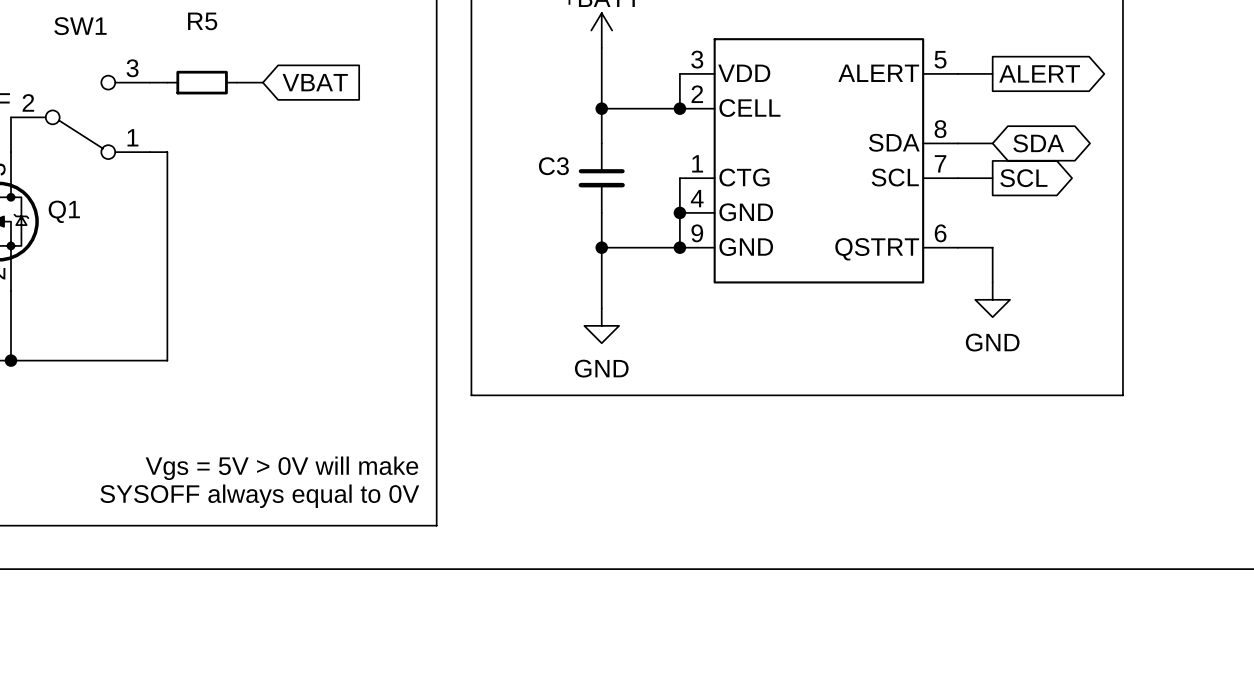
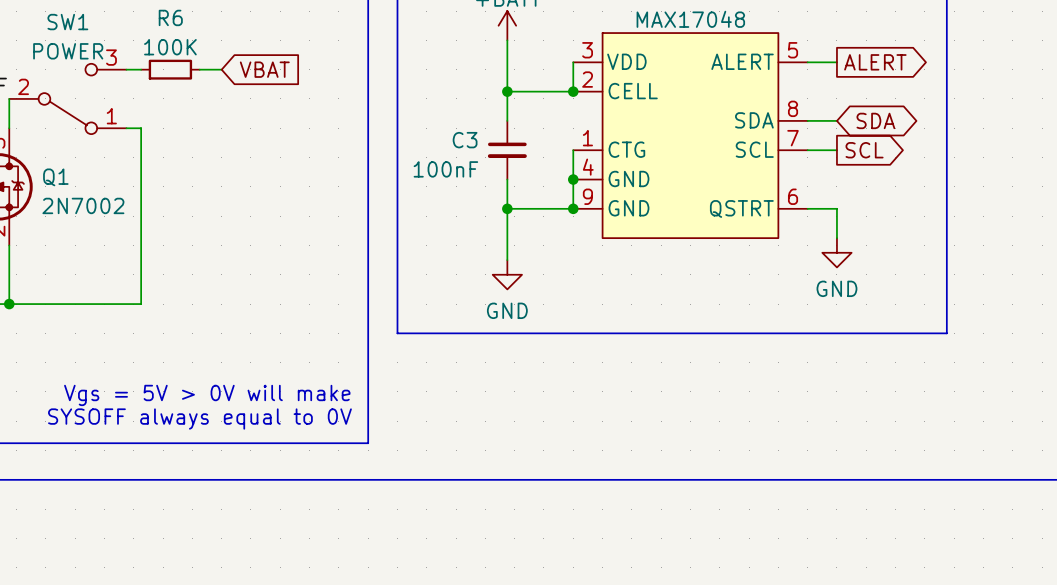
R5 name: R5 (202, 21) -> R6 (170, 17)
part value: none -> MAX17048 (690, 19)
R5 value: none -> 100K (170, 47)
SW1 value: none -> POWER (68, 51)
C3 value: none -> 100nF (445, 169)
Q1 value: none -> 2N7002 (83, 205)

